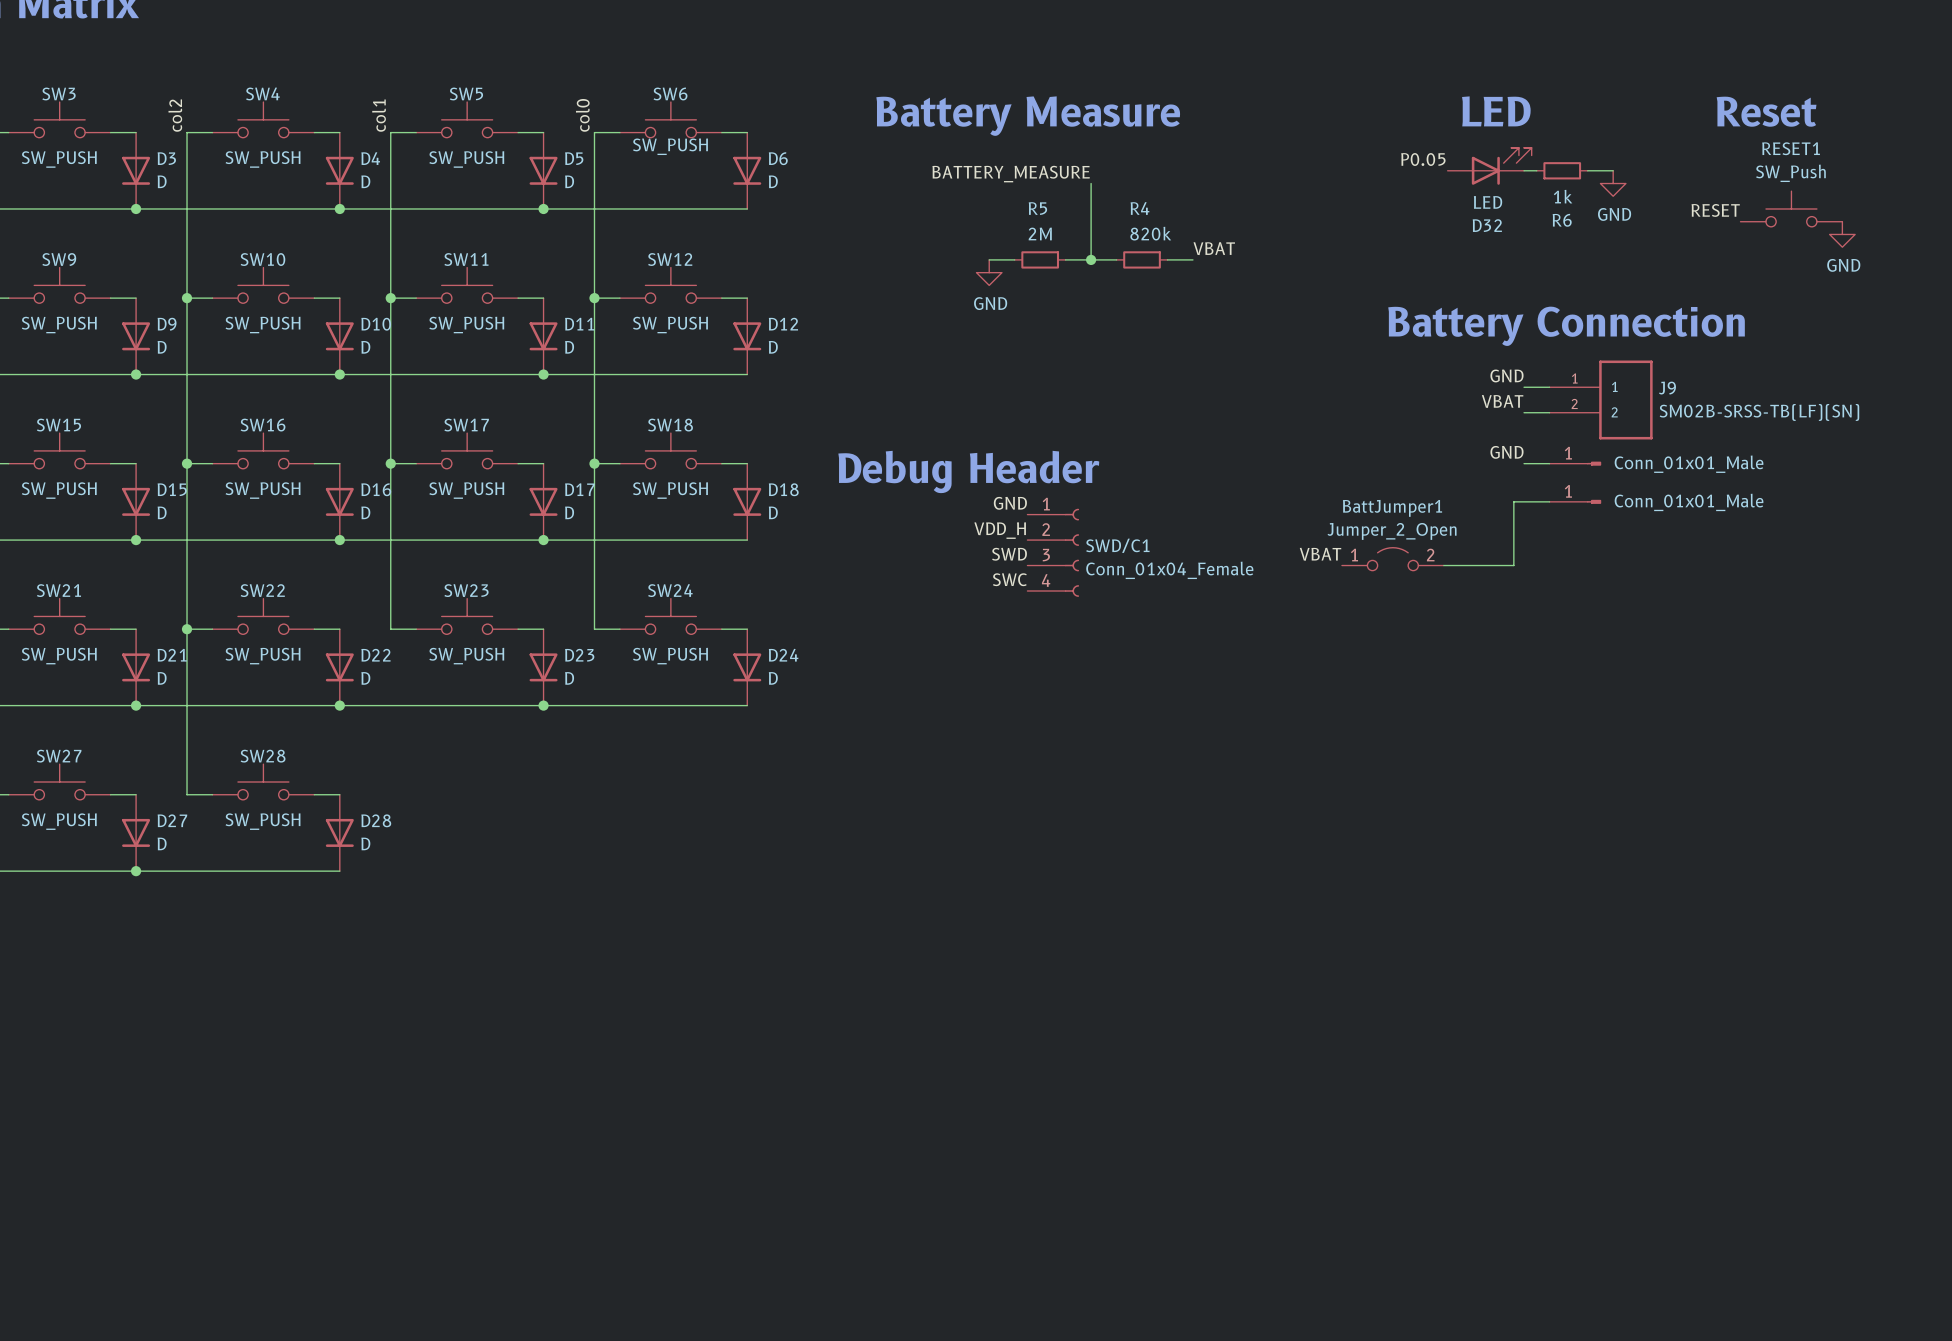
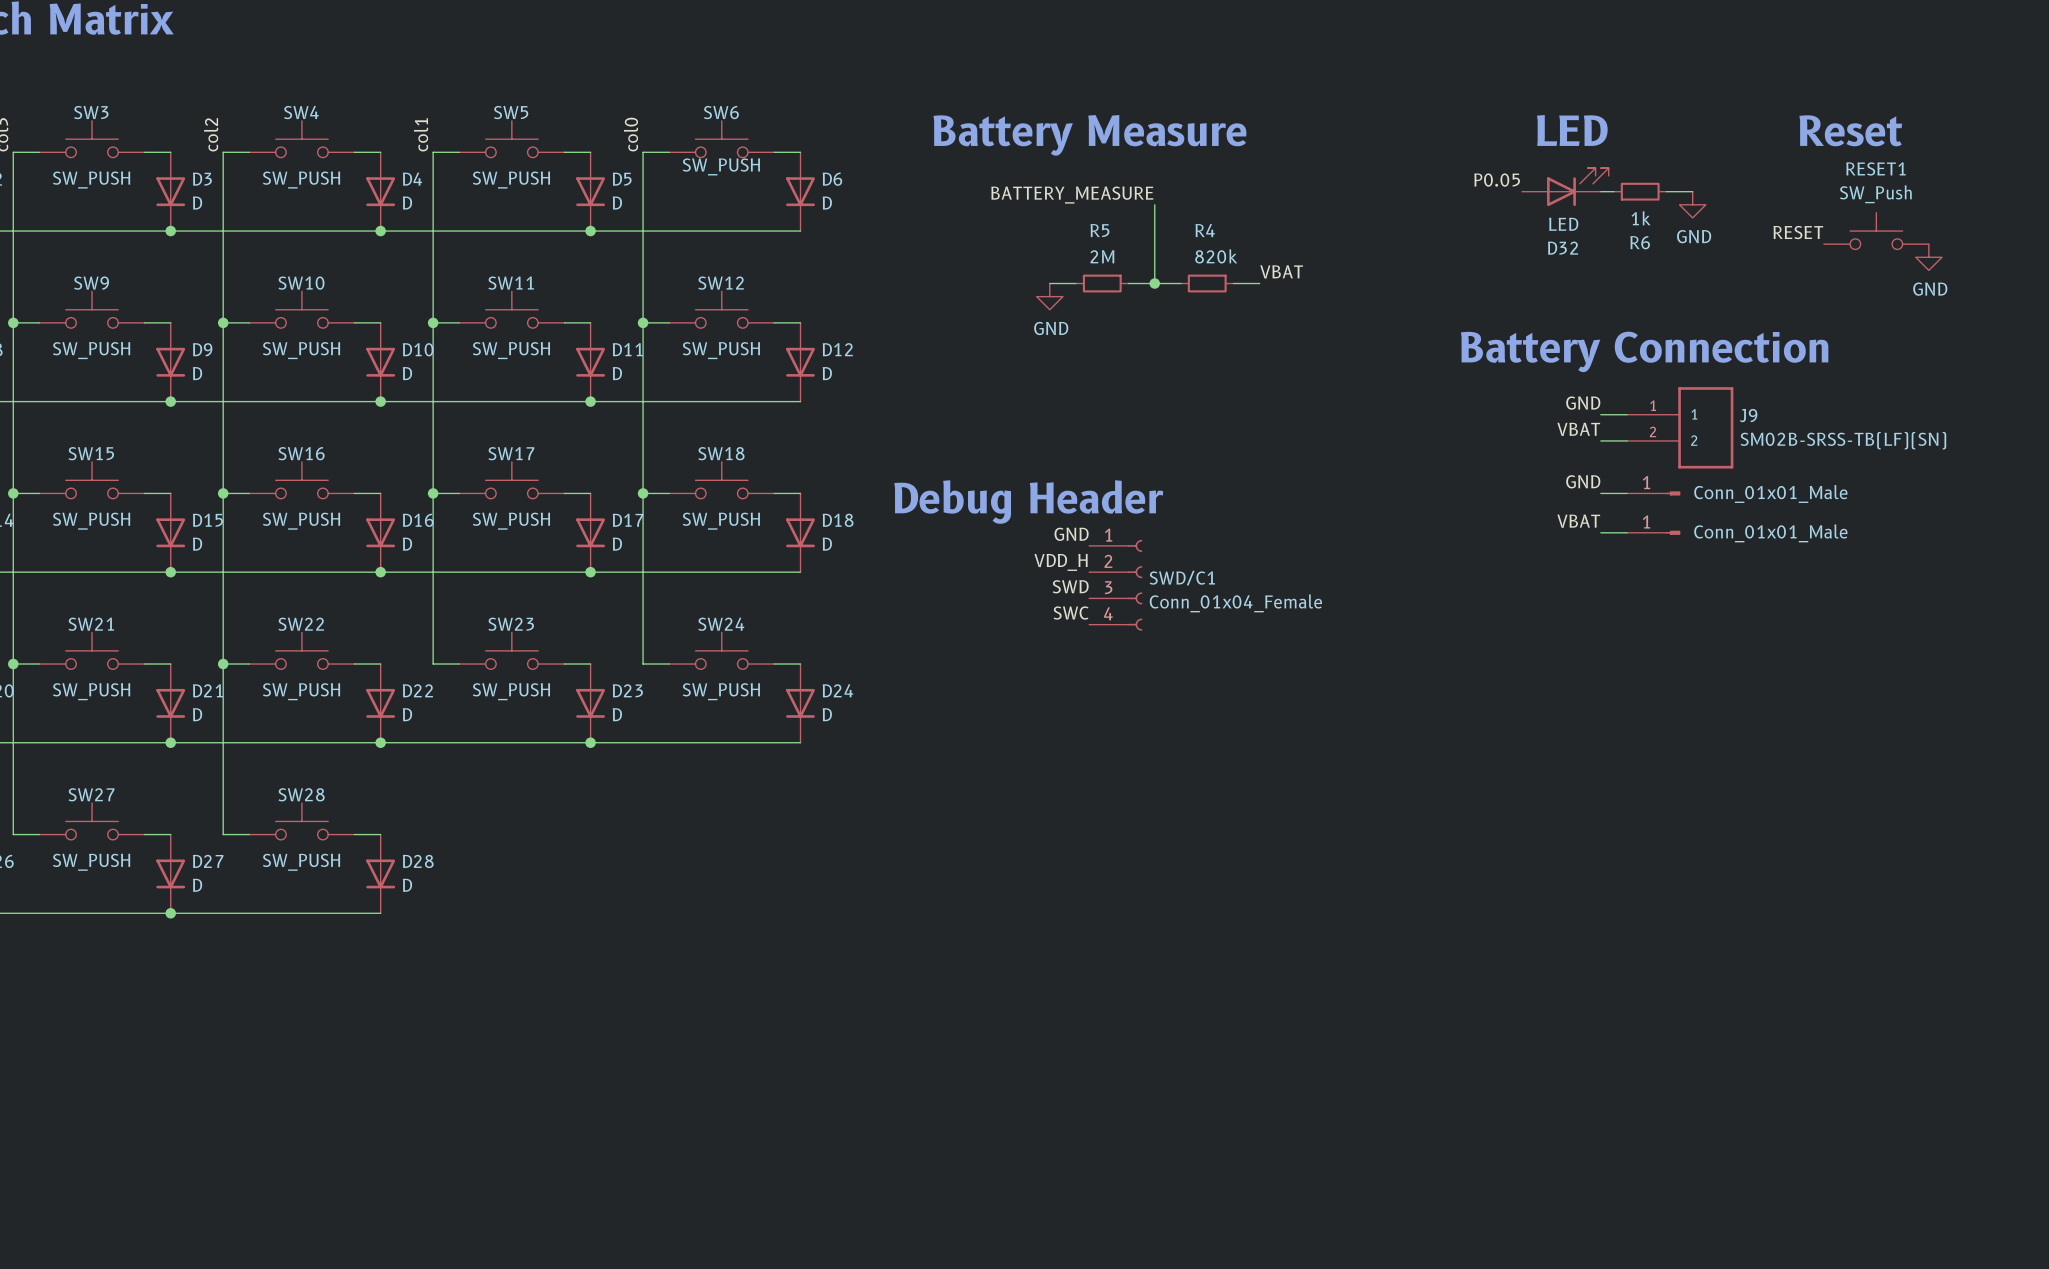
wire: (1524, 501) (1513, 501) (1513, 565) (1443, 565) -> none
label position: VBAT (1320, 554) -> VBAT (1578, 521)
BattJumper1: Jumper_2_Open (1392, 559) -> none

